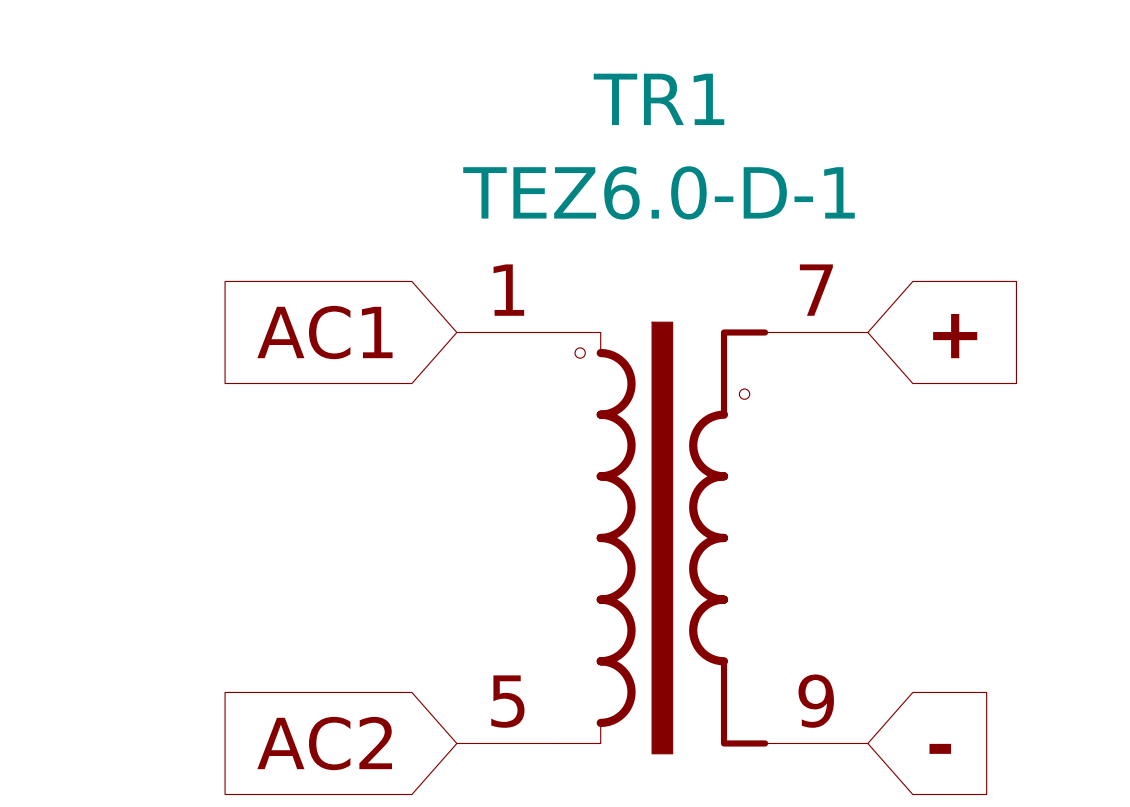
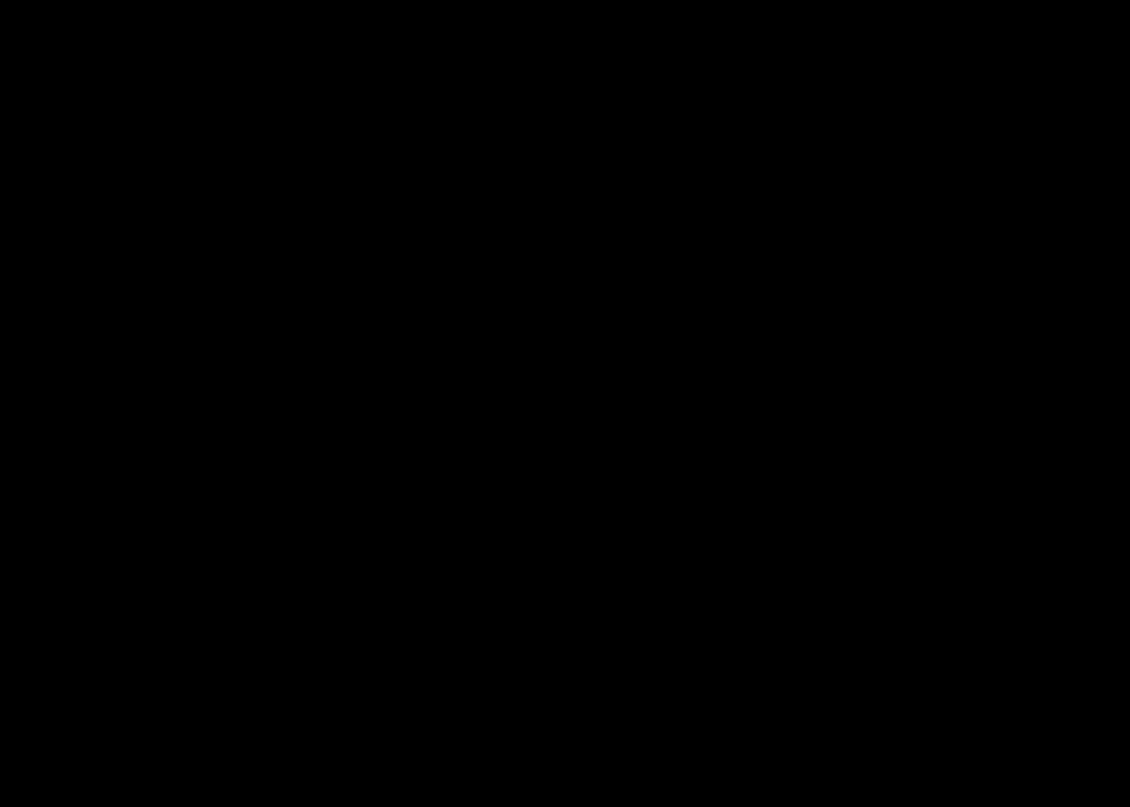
global label: AC1 (324, 332) -> none
global label: + (955, 336) -> none
TR1: TEZ6.0-D-1 (662, 537) -> none
global label: AC2 (324, 743) -> none
global label: - (940, 748) -> none

